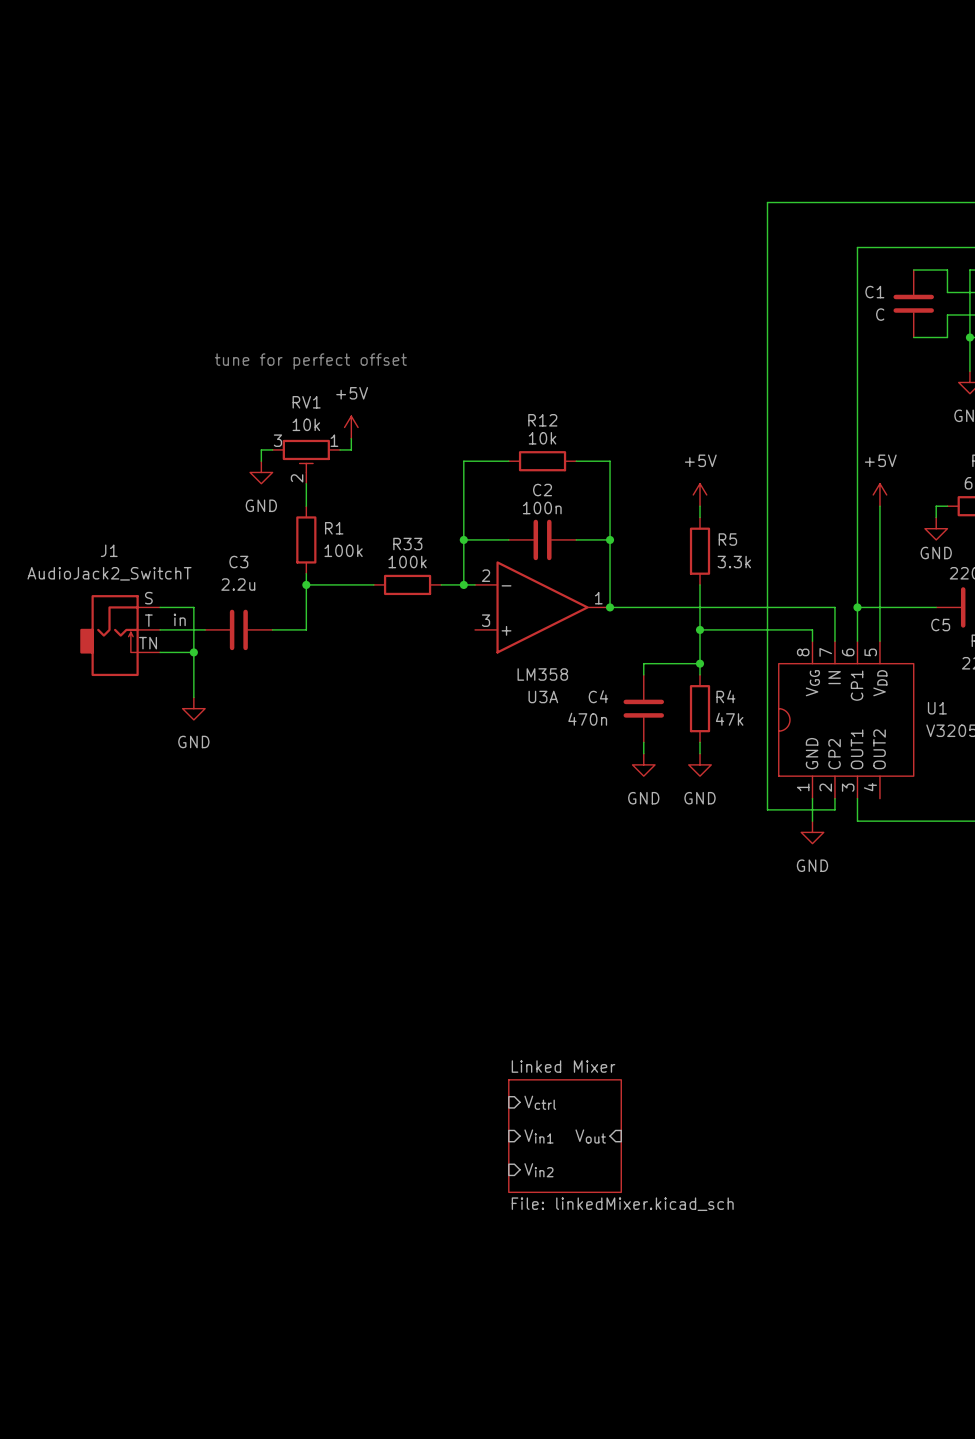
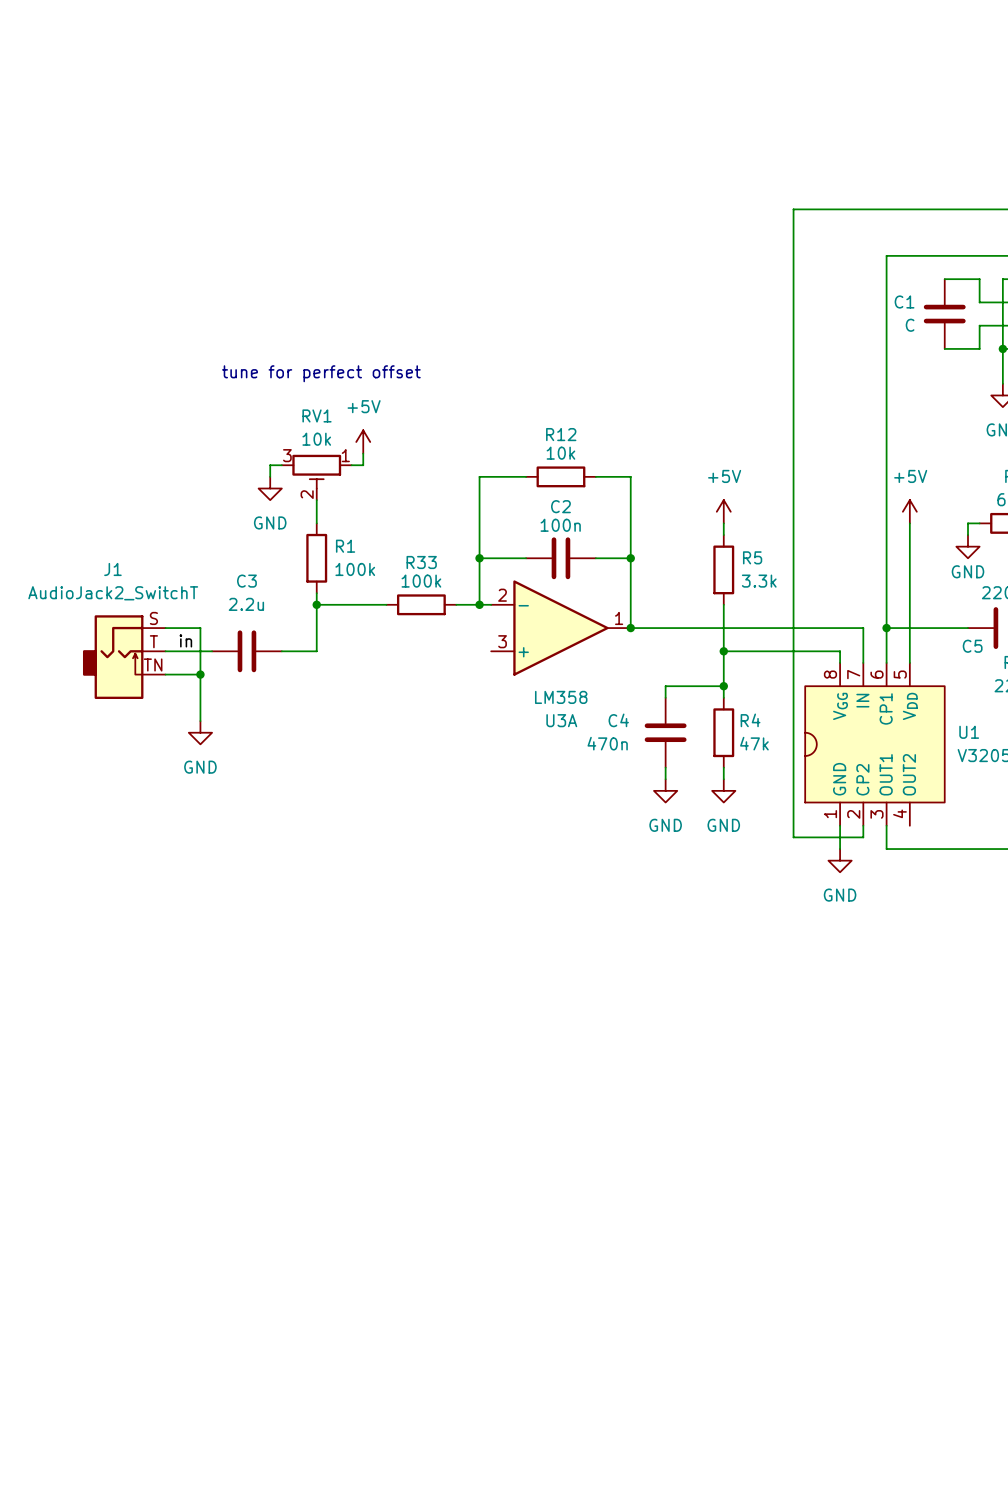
sheet pin: Vctrl (540, 1102) -> none
sheet pin: Vin1 (538, 1136) -> none
sheet Linked Mixer: File: linkedMixer.kicad_sch (565, 1136) -> none
sheet pin: Vout (590, 1136) -> none
sheet pin: Vin2 (538, 1170) -> none

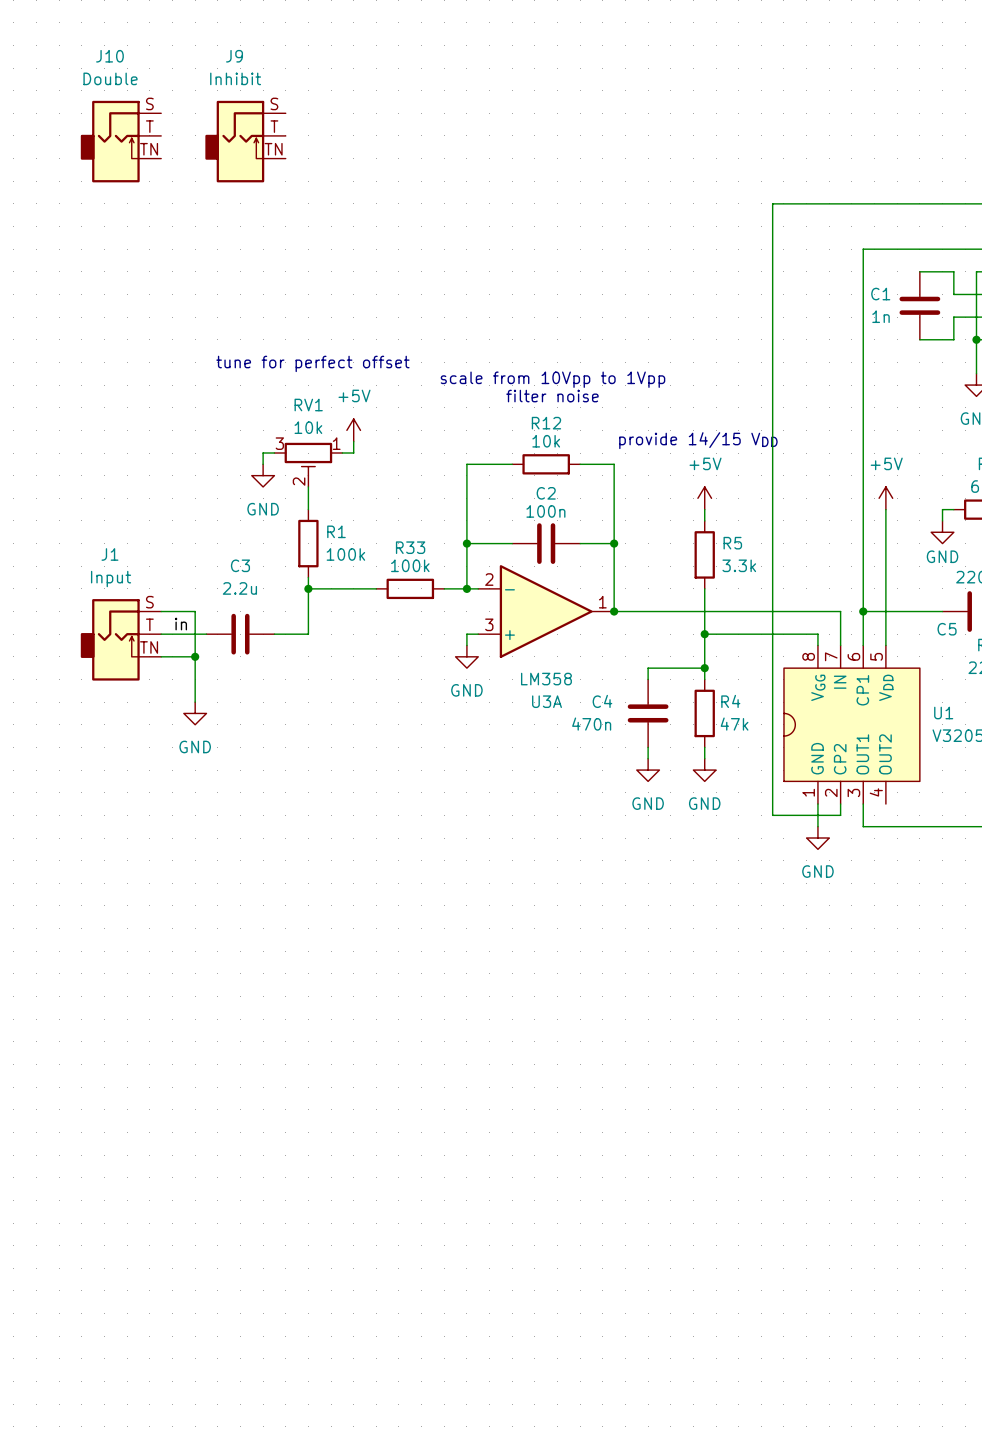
J10: none -> Double (120, 141)
J9: none -> Inhibit (245, 141)
C1 value: C (910, 325) -> 1n (881, 316)
text: none -> scale from 10Vpp to 1Vpp (552, 379)
text: none -> filter noise (552, 396)
text: none -> provide 14/15 VDD (698, 440)
J1 value: AudioJack2_SwitchT (113, 593) -> Input (111, 579)
wire: none -> (478, 634) (466, 634) (466, 645)
power symbol: none -> GND (466, 656)

